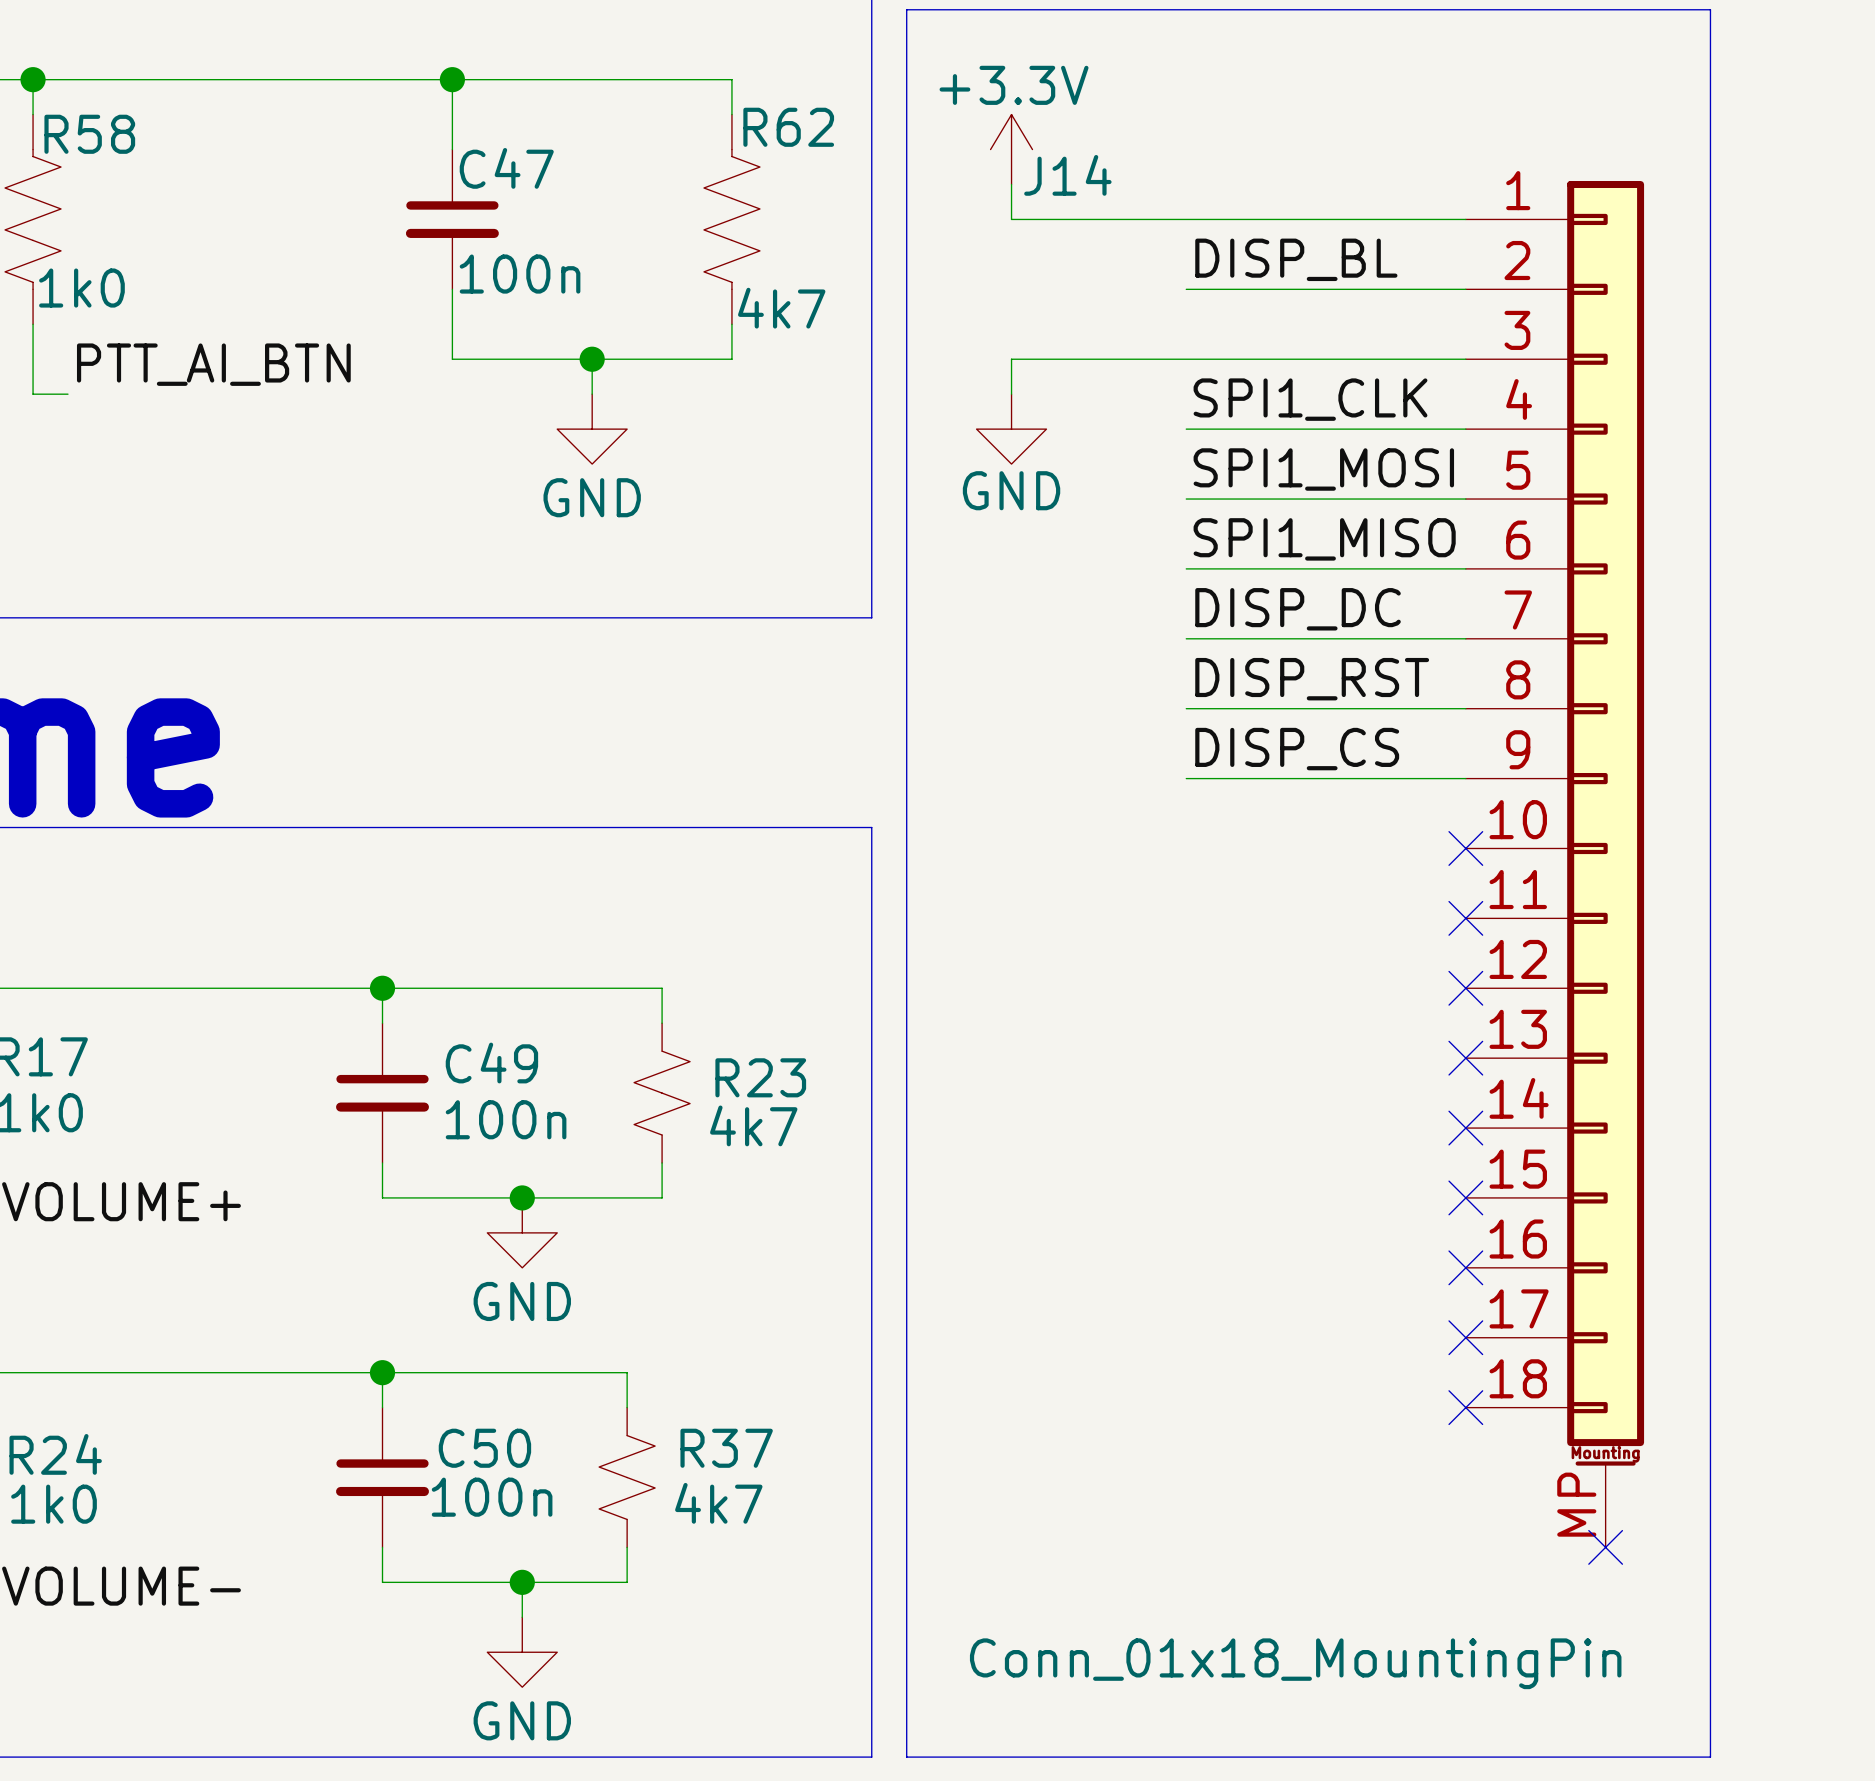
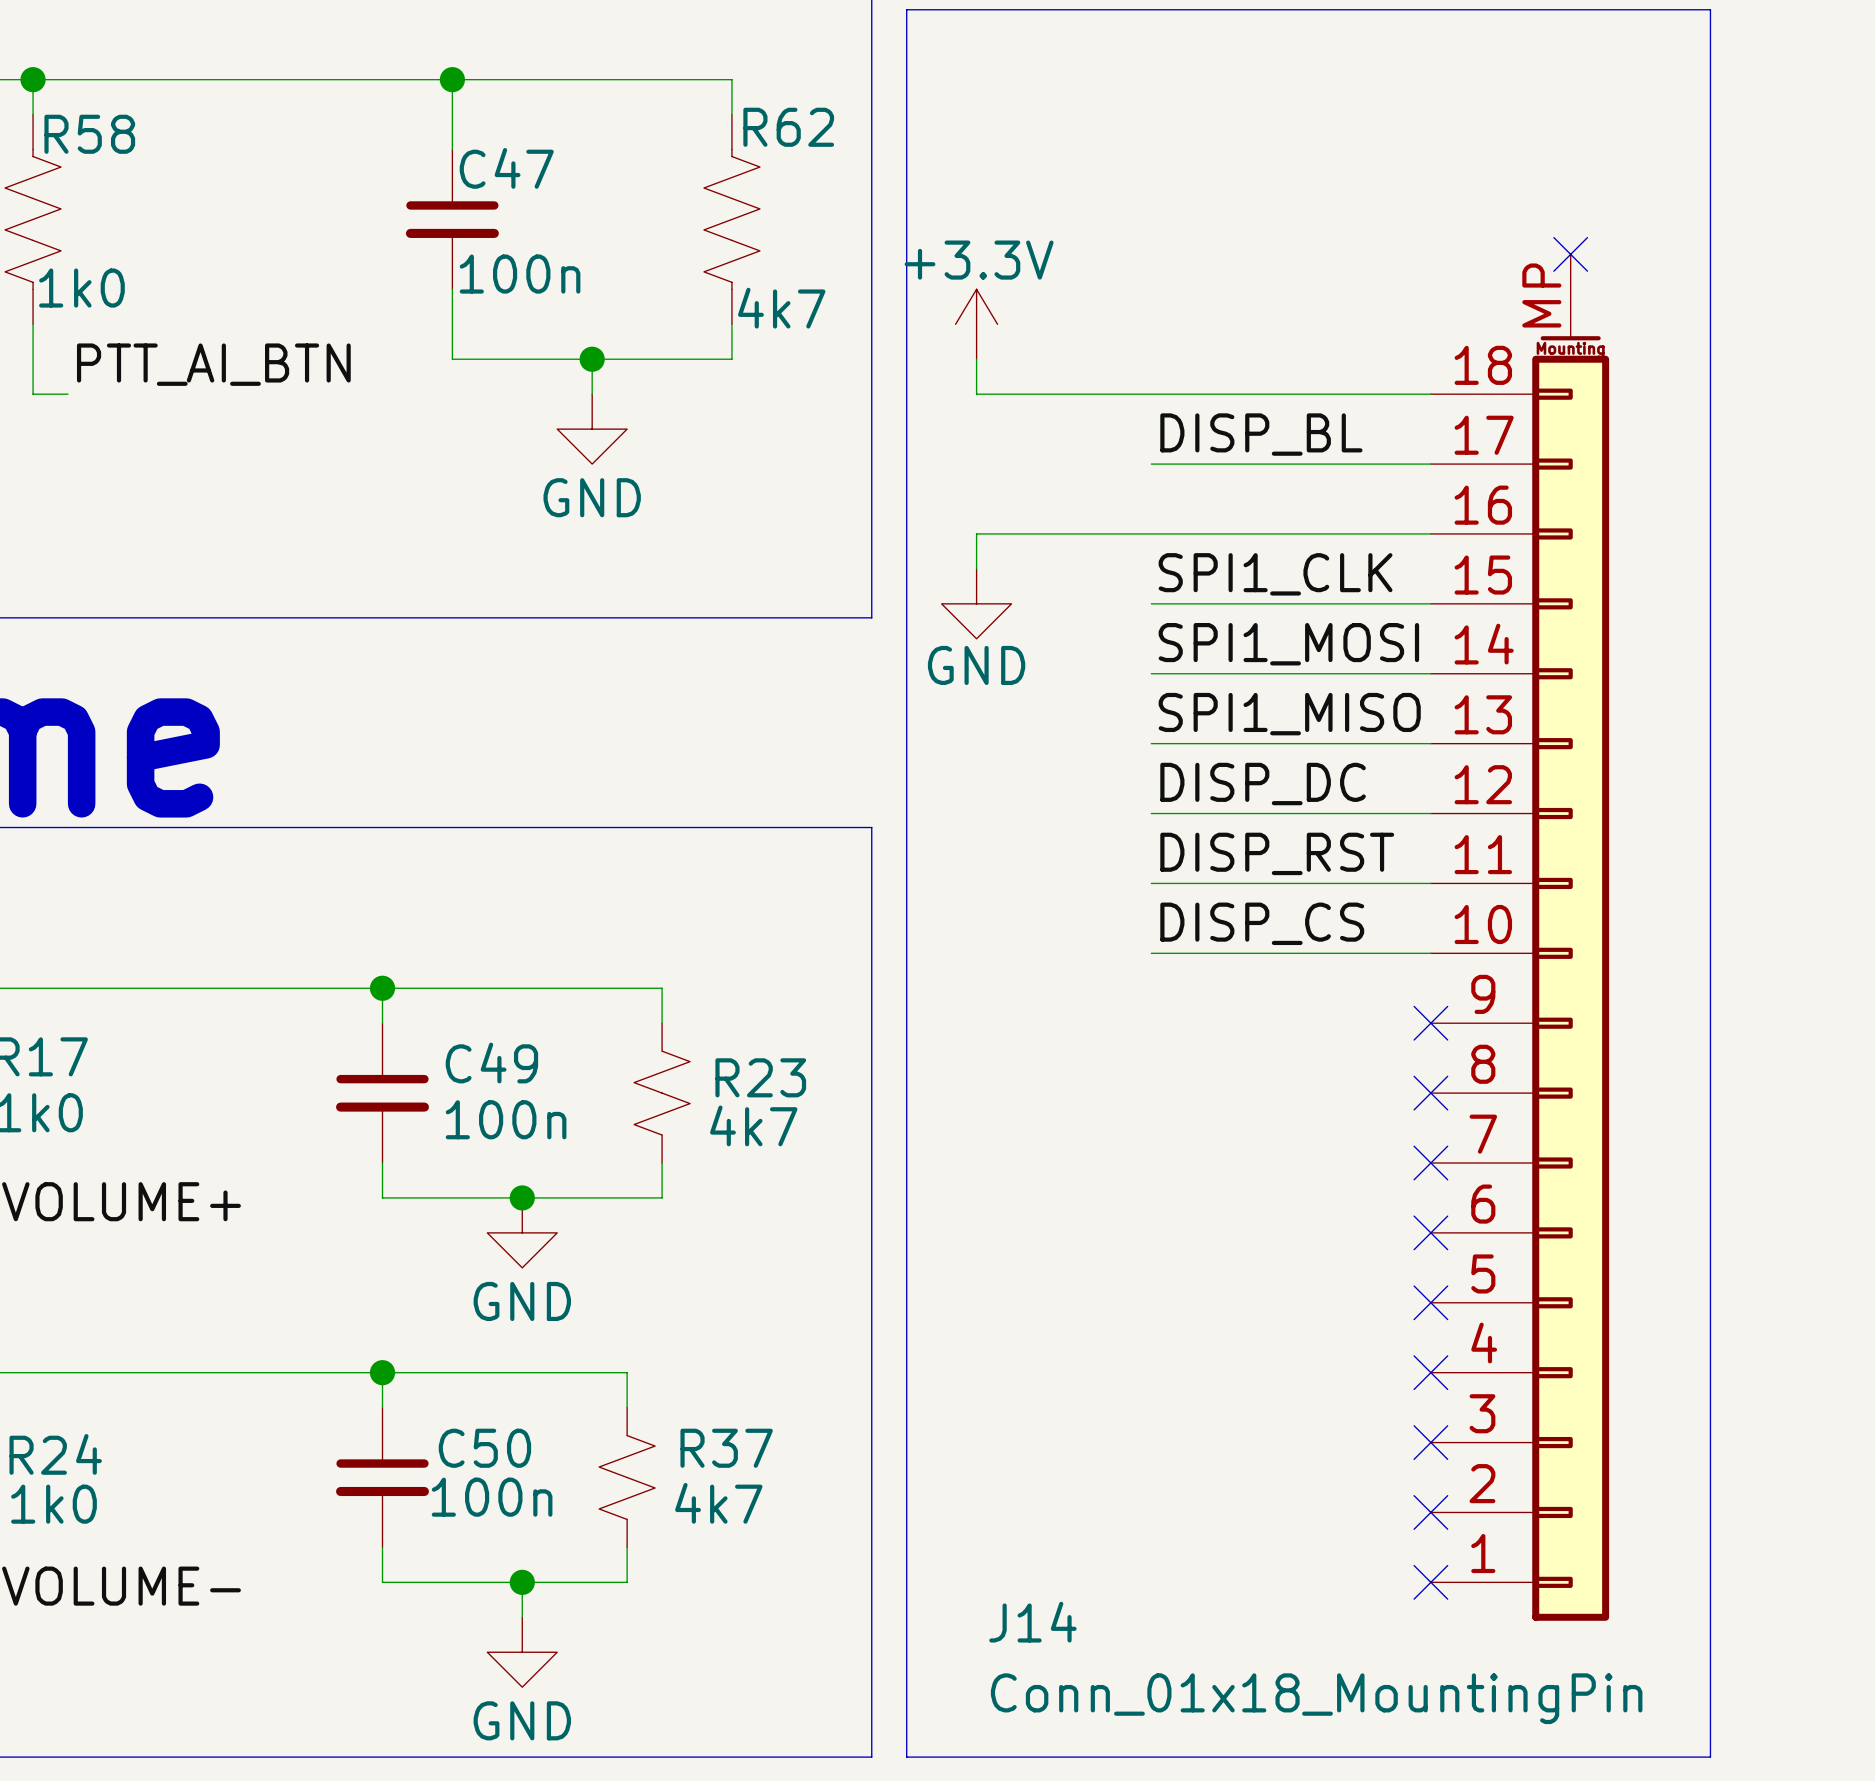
power symbol position: +3.3V (1011, 149) -> +3.3V (976, 324)
wire: (1011, 184) (1011, 219) (1465, 219) -> (976, 359) (976, 394) (1430, 394)
no-connect mark: none -> (1570, 254)
label position: DISP_BL (1296, 259) -> DISP_BL (1261, 434)
wire: (1186, 289) (1465, 289) -> (1151, 464) (1430, 464)
wire: (1465, 359) (1011, 359) (1011, 394) -> (1430, 533) (976, 533) (976, 568)
label position: SPI1_CLK (1310, 399) -> SPI1_CLK (1275, 574)
power symbol position: GND (1011, 429) -> GND (976, 603)
wire: (1186, 429) (1465, 429) -> (1151, 603) (1430, 603)
label position: SPI1_MOSI (1323, 469) -> SPI1_MOSI (1288, 644)
wire: (1186, 499) (1465, 499) -> (1151, 673) (1430, 673)
label position: SPI1_MISO (1324, 539) -> SPI1_MISO (1289, 714)
wire: (1186, 568) (1465, 568) -> (1151, 743) (1430, 743)
label position: DISP_DC (1298, 609) -> DISP_DC (1263, 784)
wire: (1186, 638) (1465, 638) -> (1151, 813) (1430, 813)
label position: DISP_RST (1312, 679) -> DISP_RST (1277, 853)
wire: (1186, 708) (1465, 708) -> (1151, 883) (1430, 883)
label position: DISP_CS (1297, 749) -> DISP_CS (1262, 923)
wire: (1186, 778) (1465, 778) -> (1151, 953) (1430, 953)
J14 flip: as is (1605, 823) -> up-down (1570, 978)
no-connect mark: (1465, 848) -> none
no-connect mark: (1465, 918) -> none
no-connect mark: (1465, 988) -> none
no-connect mark: none -> (1430, 1023)
no-connect mark: (1465, 1058) -> none
no-connect mark: none -> (1430, 1093)
no-connect mark: (1465, 1128) -> none
no-connect mark: none -> (1430, 1163)
no-connect mark: (1465, 1197) -> none
no-connect mark: none -> (1430, 1232)
no-connect mark: (1465, 1267) -> none
no-connect mark: none -> (1430, 1302)
no-connect mark: (1465, 1337) -> none
no-connect mark: none -> (1430, 1372)
no-connect mark: (1465, 1407) -> none
no-connect mark: none -> (1430, 1442)
no-connect mark: none -> (1430, 1512)
no-connect mark: (1605, 1547) -> none
no-connect mark: none -> (1430, 1582)
J14 value position: Conn_01x18_MountingPin (1295, 1663) -> Conn_01x18_MountingPin (1316, 1698)

